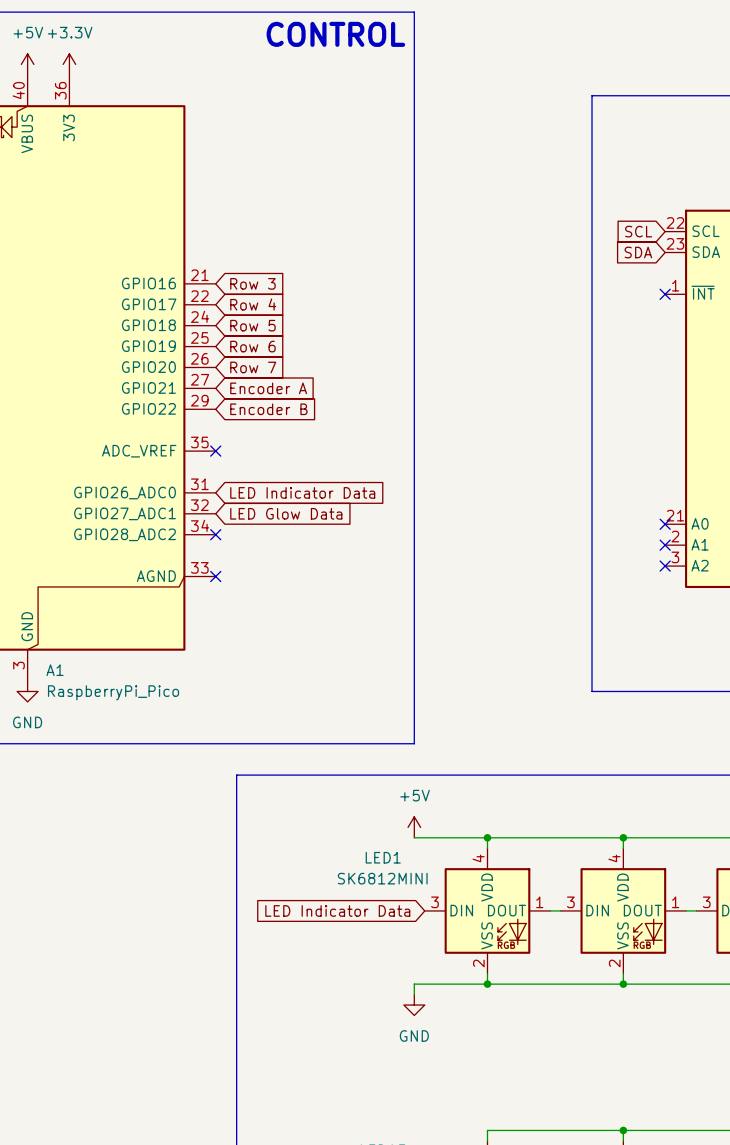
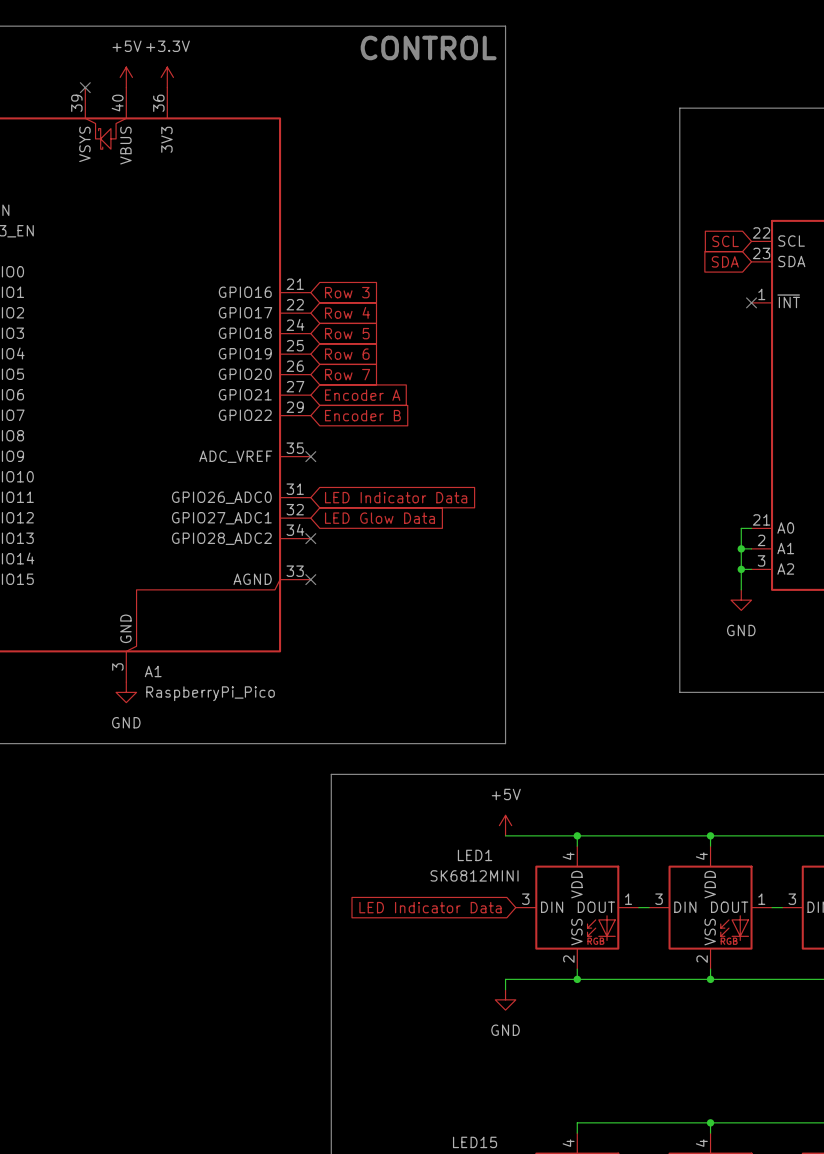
wire: none -> (751, 528) (741, 528) (741, 589)
no-connect mark: (665, 524) -> none
wire: none -> (741, 548) (751, 548)
junction: none -> (741, 548)
no-connect mark: (665, 545) -> none
wire: none -> (741, 569) (751, 569)
junction: none -> (741, 569)
no-connect mark: (665, 566) -> none
power symbol: none -> GND (741, 600)

